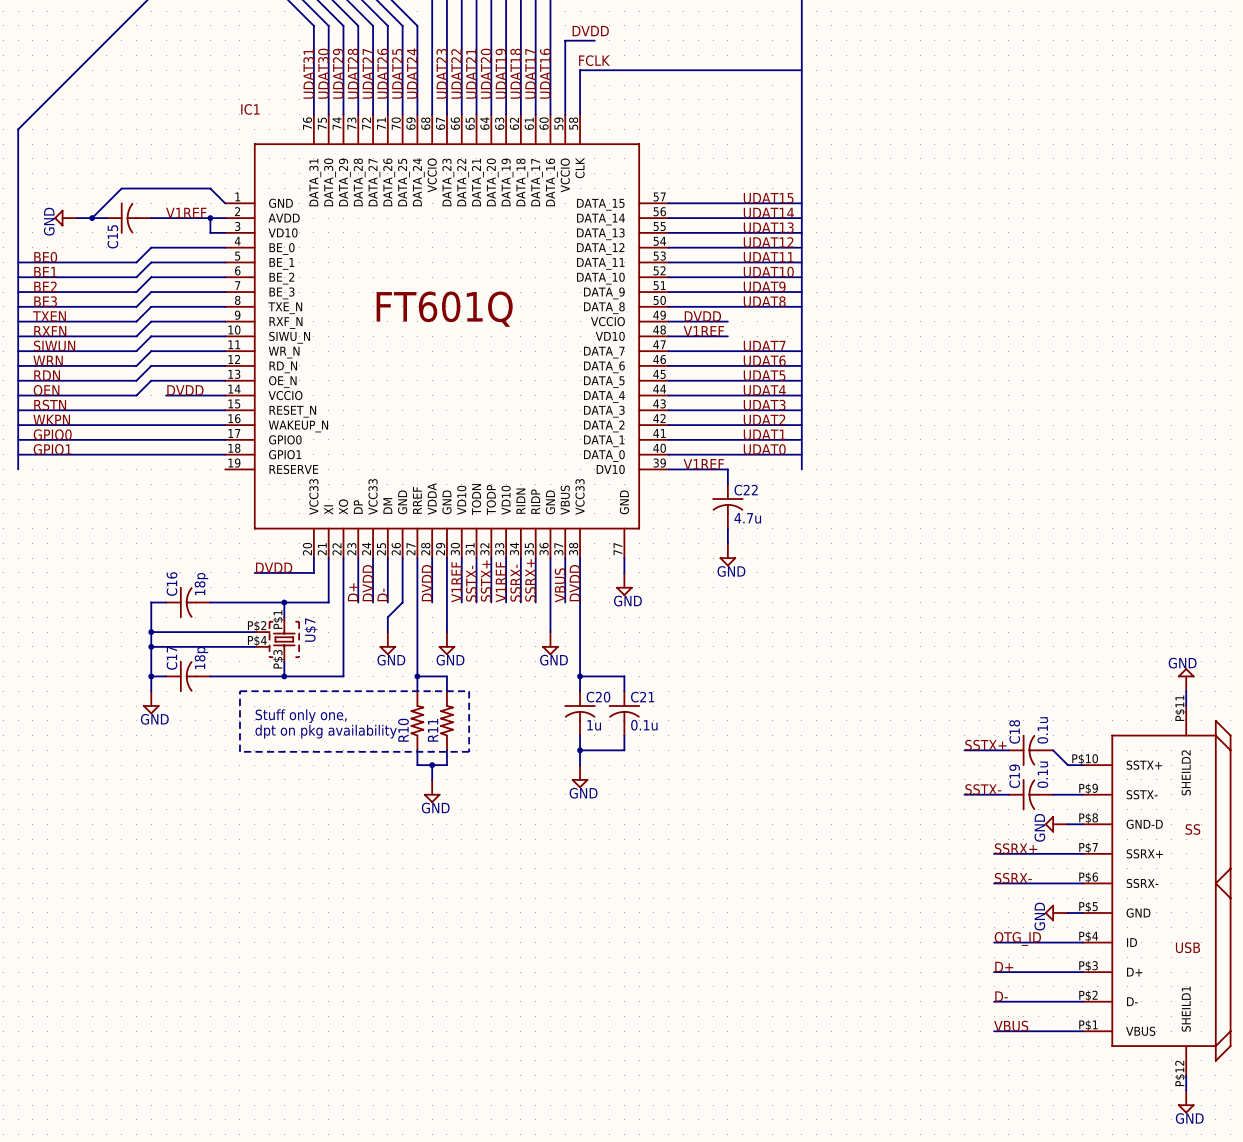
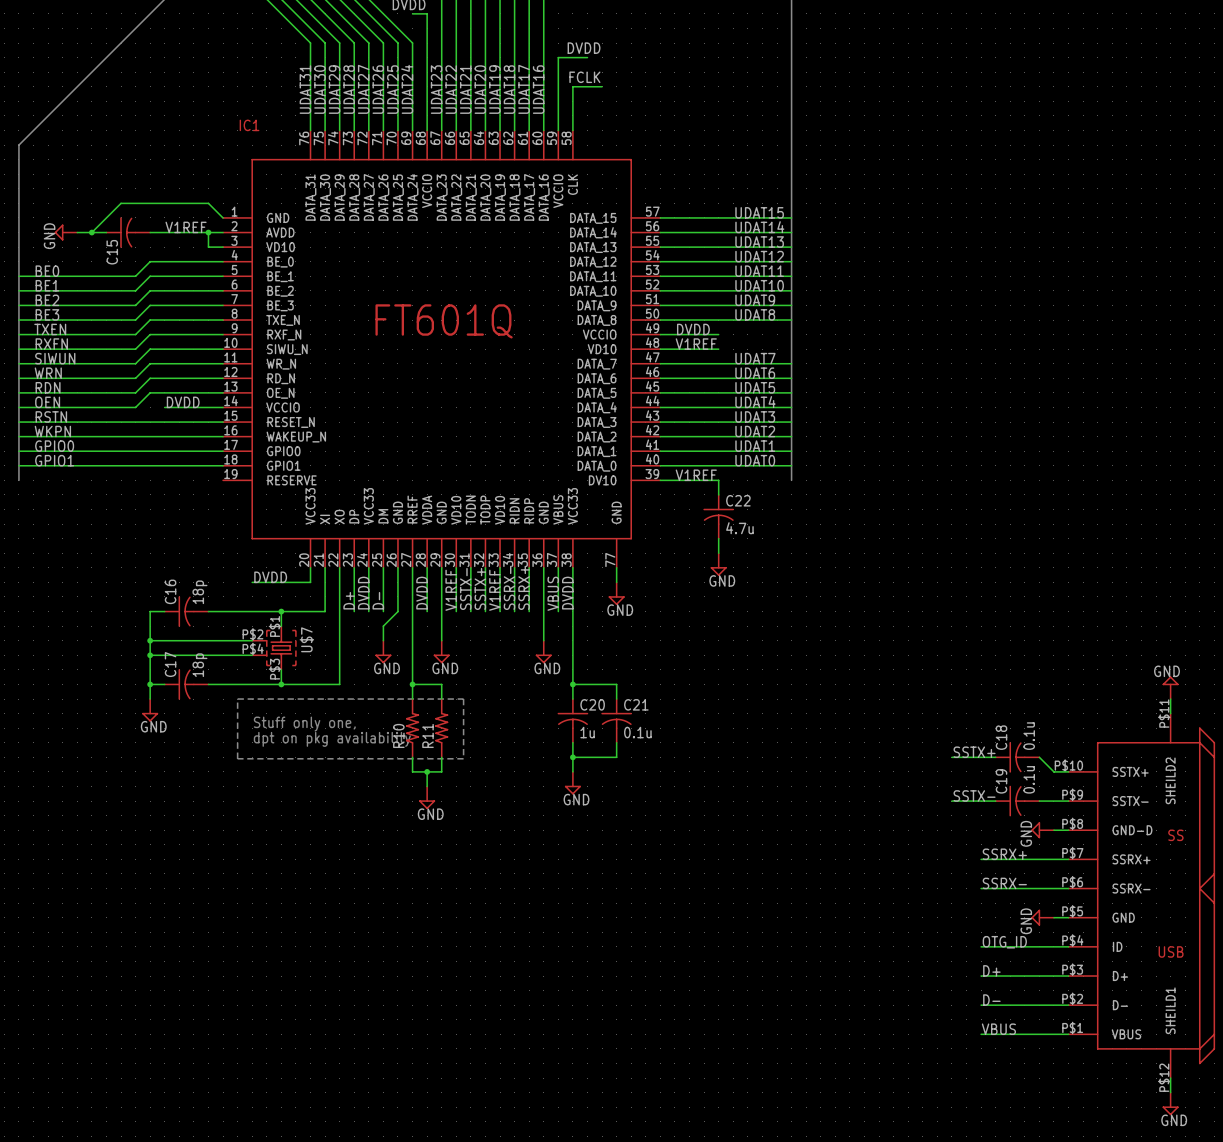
wire: (609, 70) (801, 70) -> none

